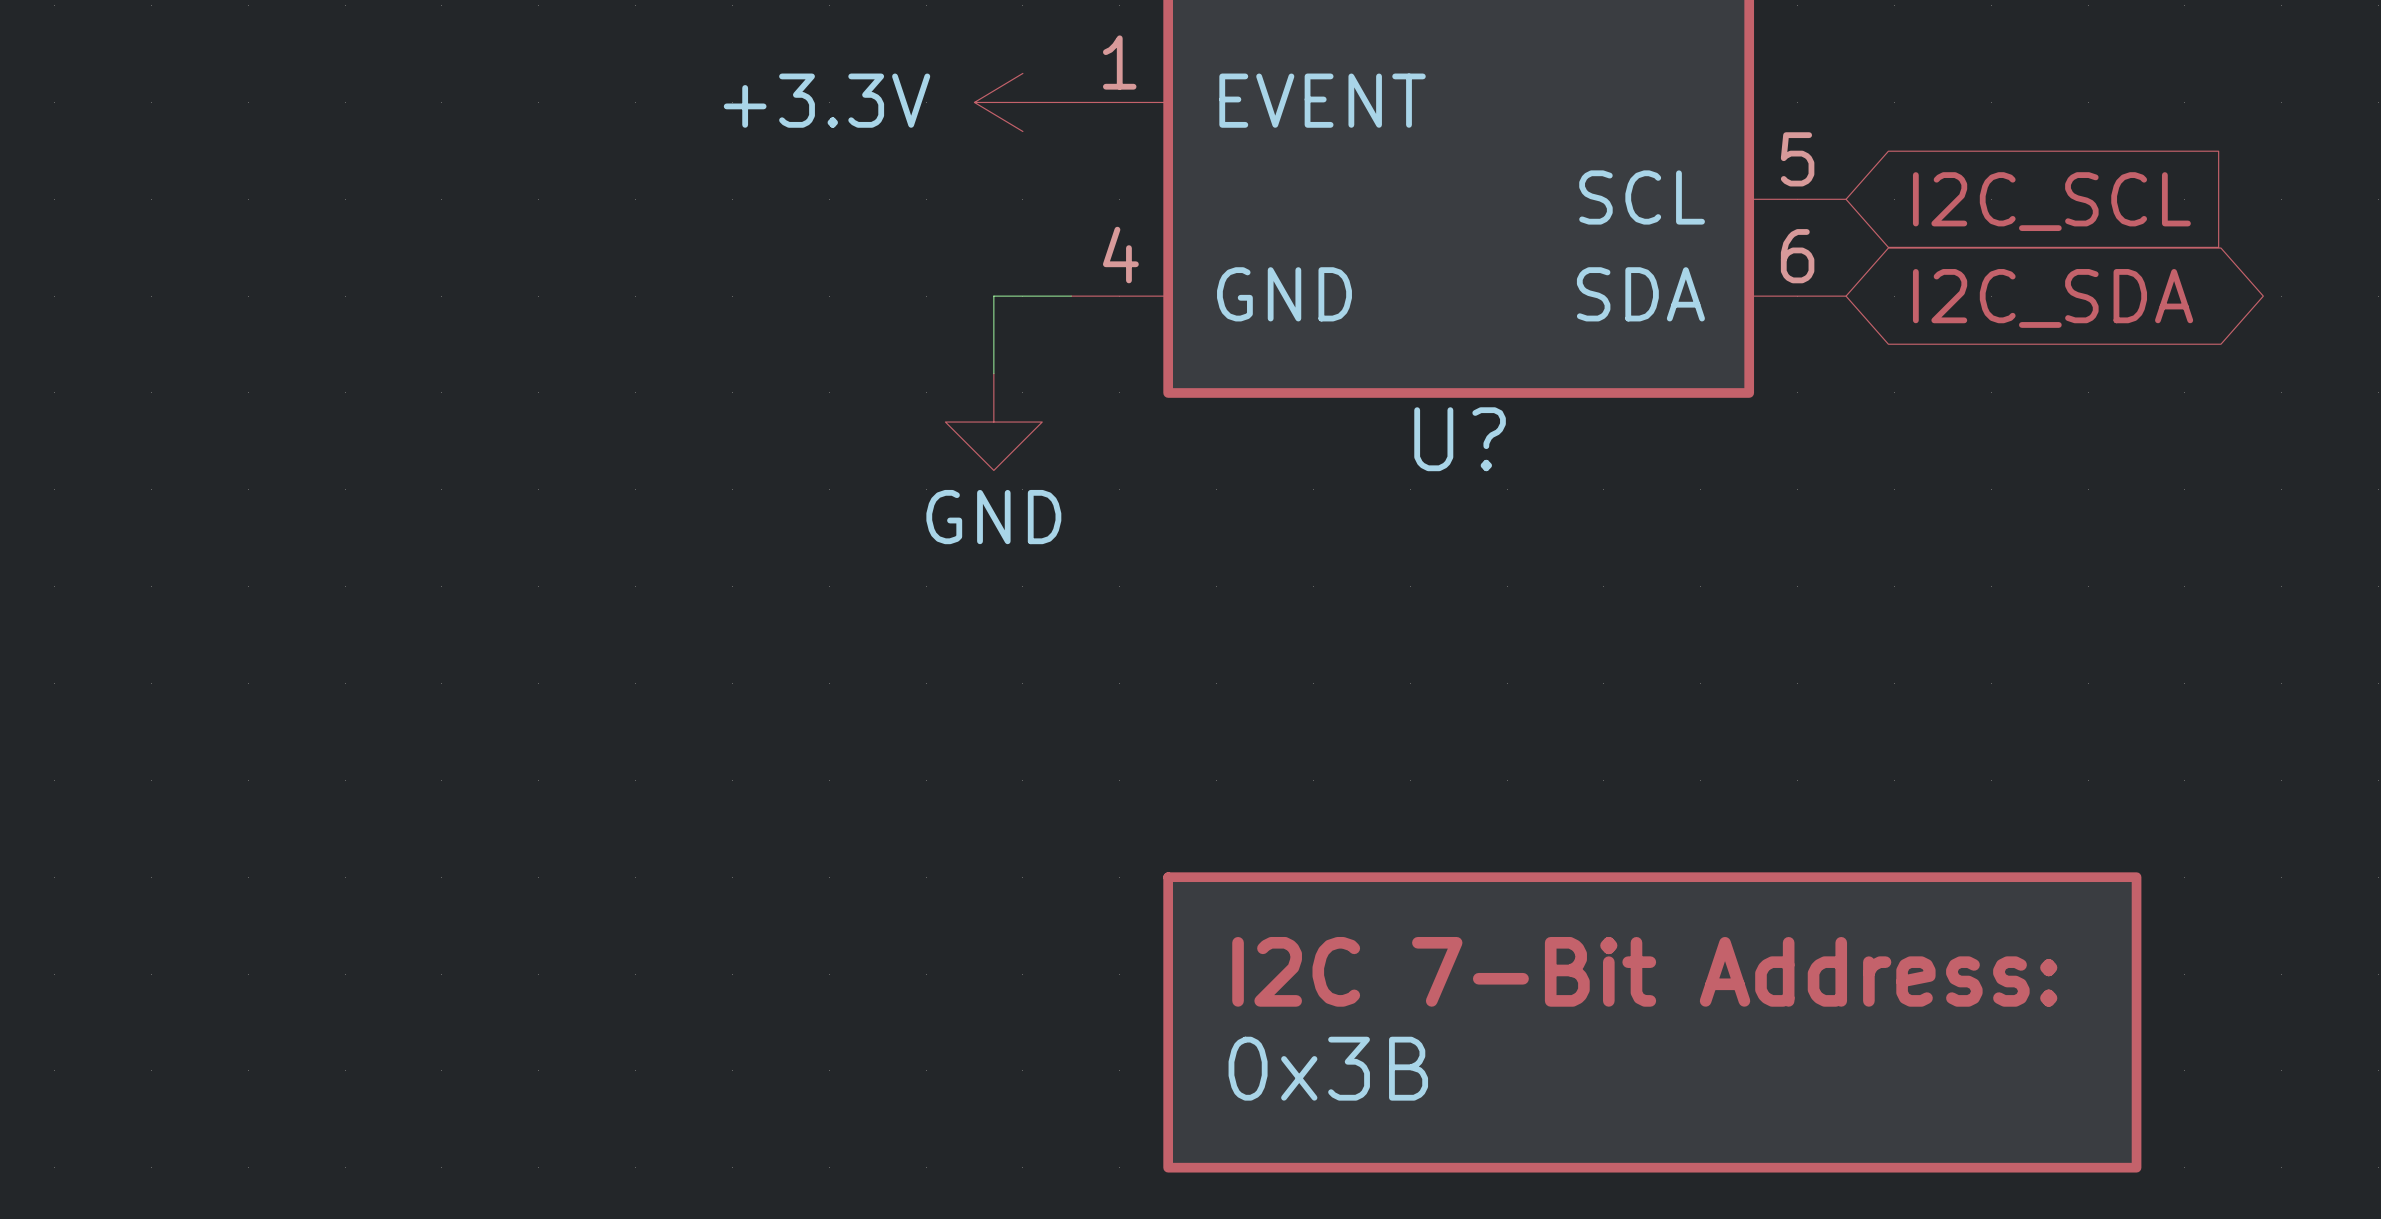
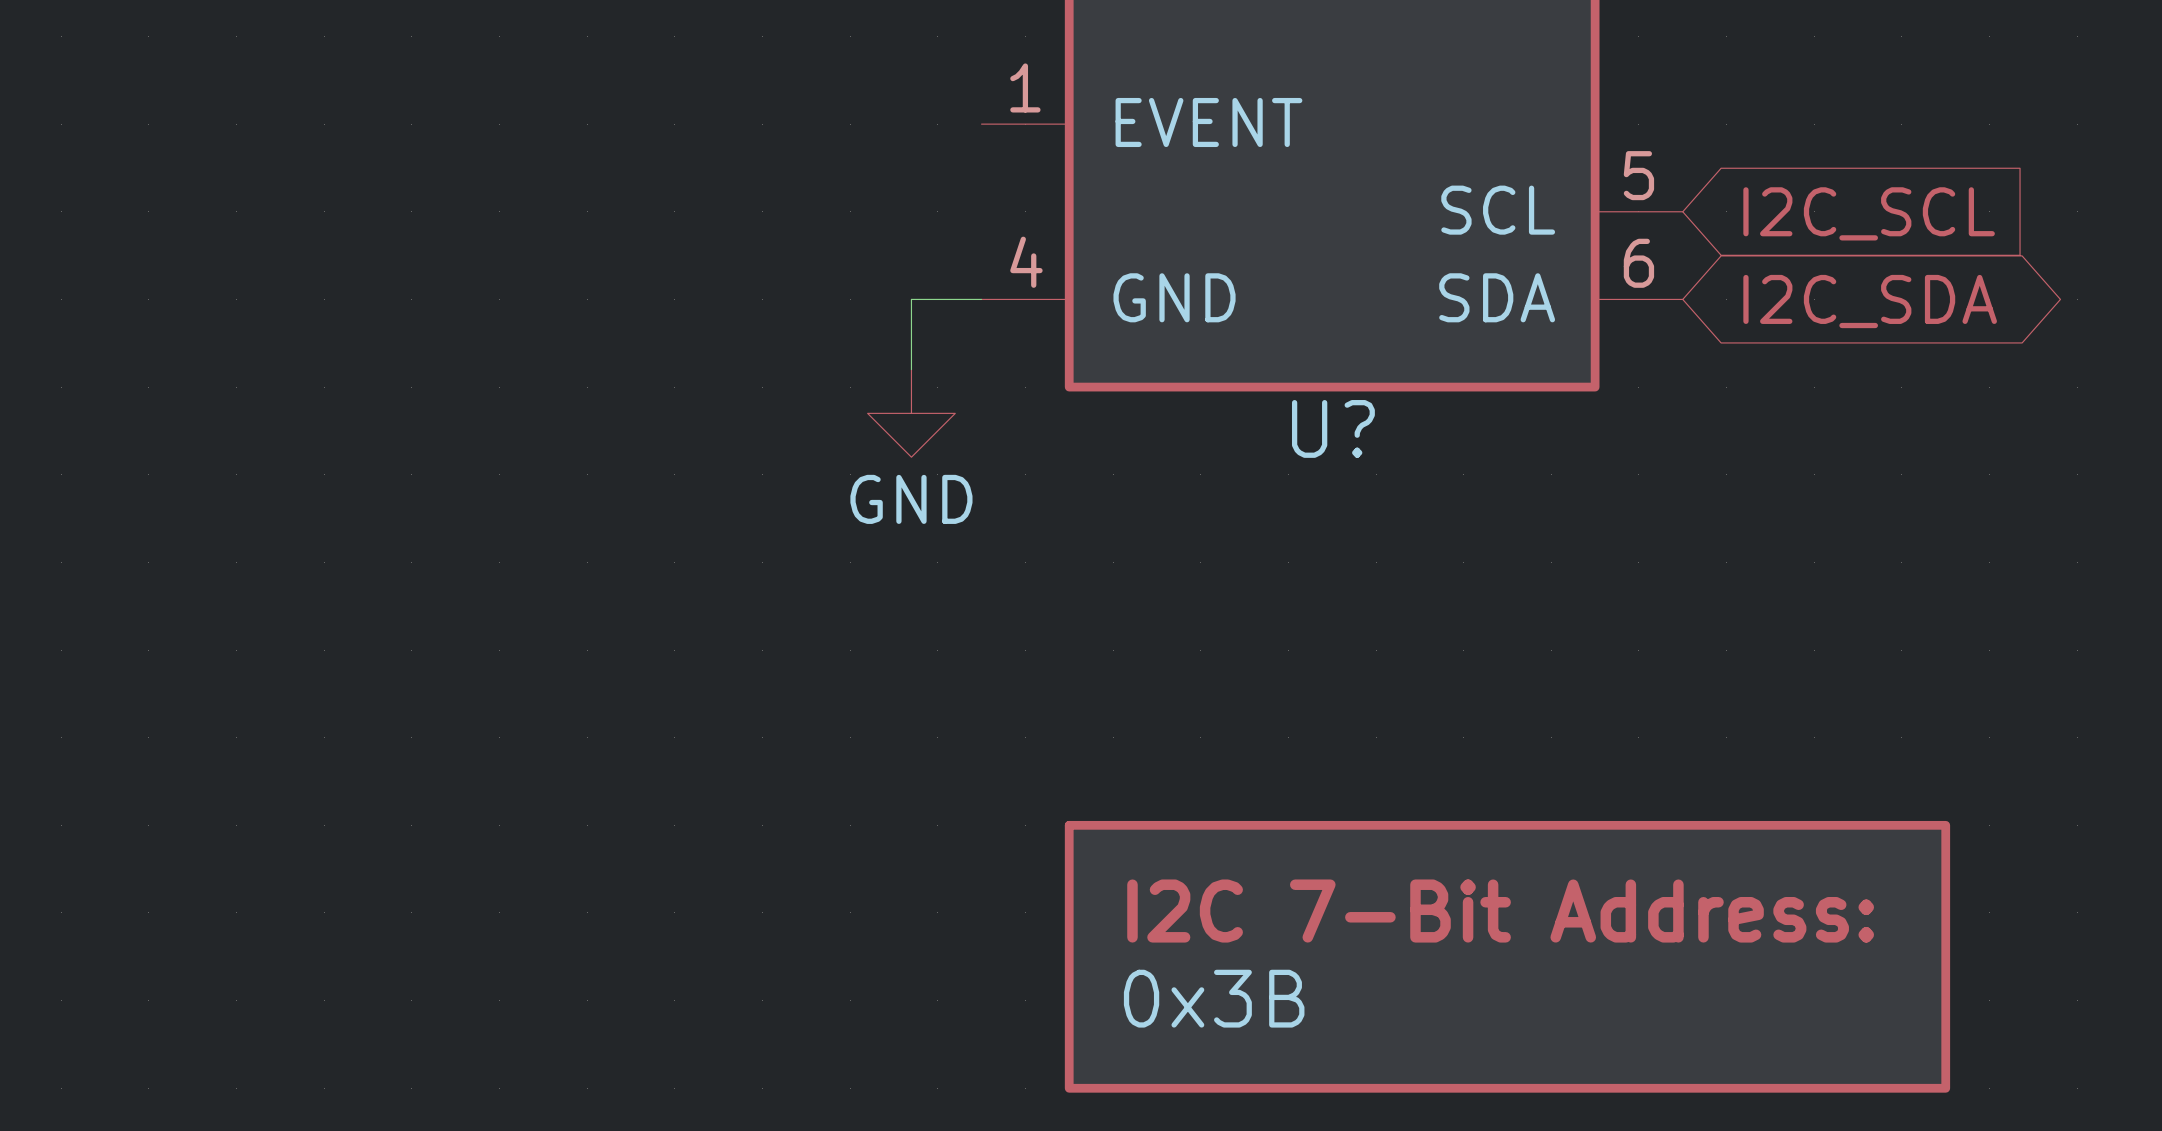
power symbol: +3.3V (1022, 102) -> none

